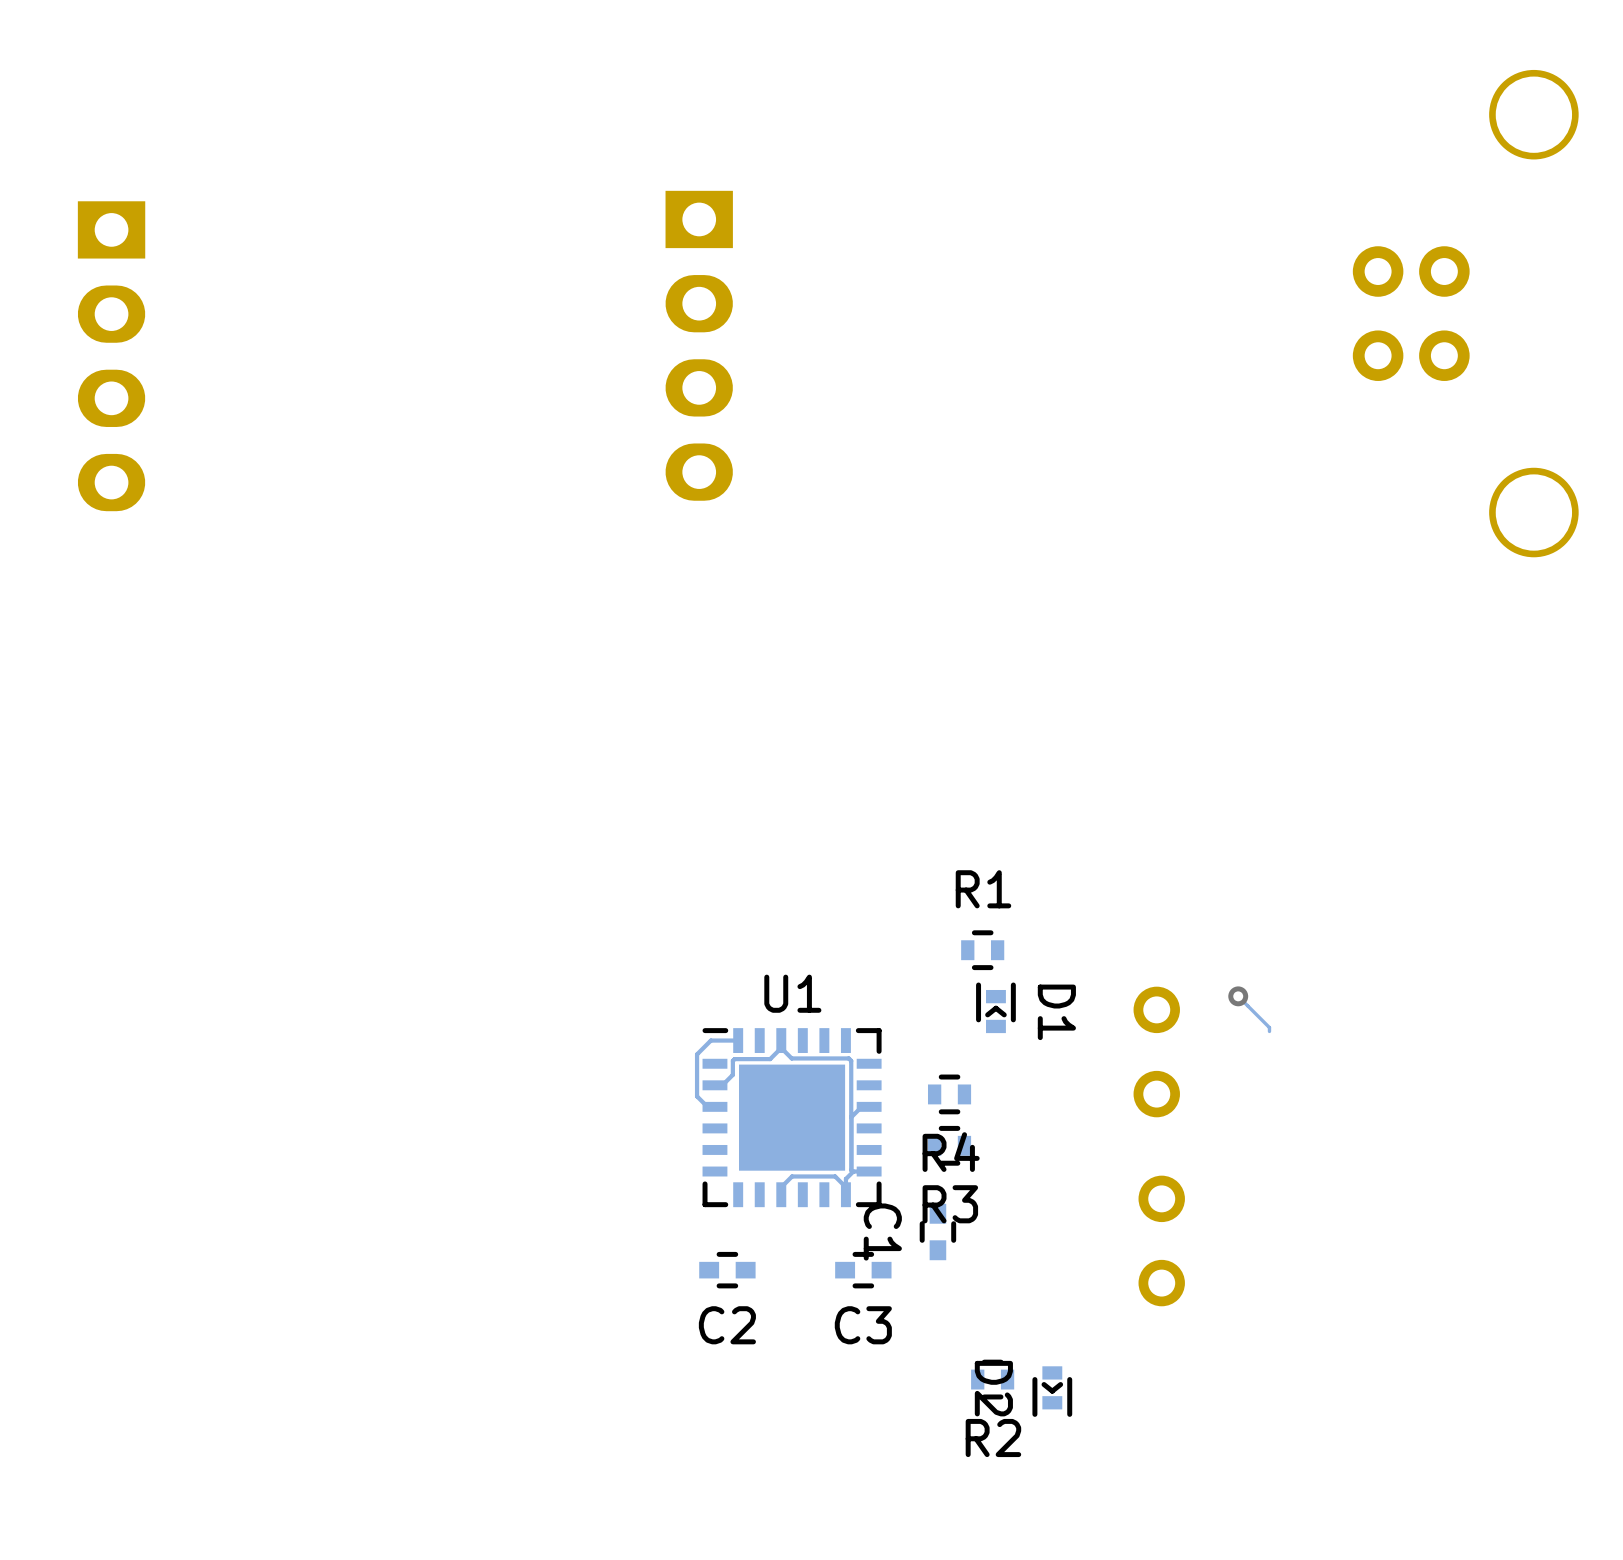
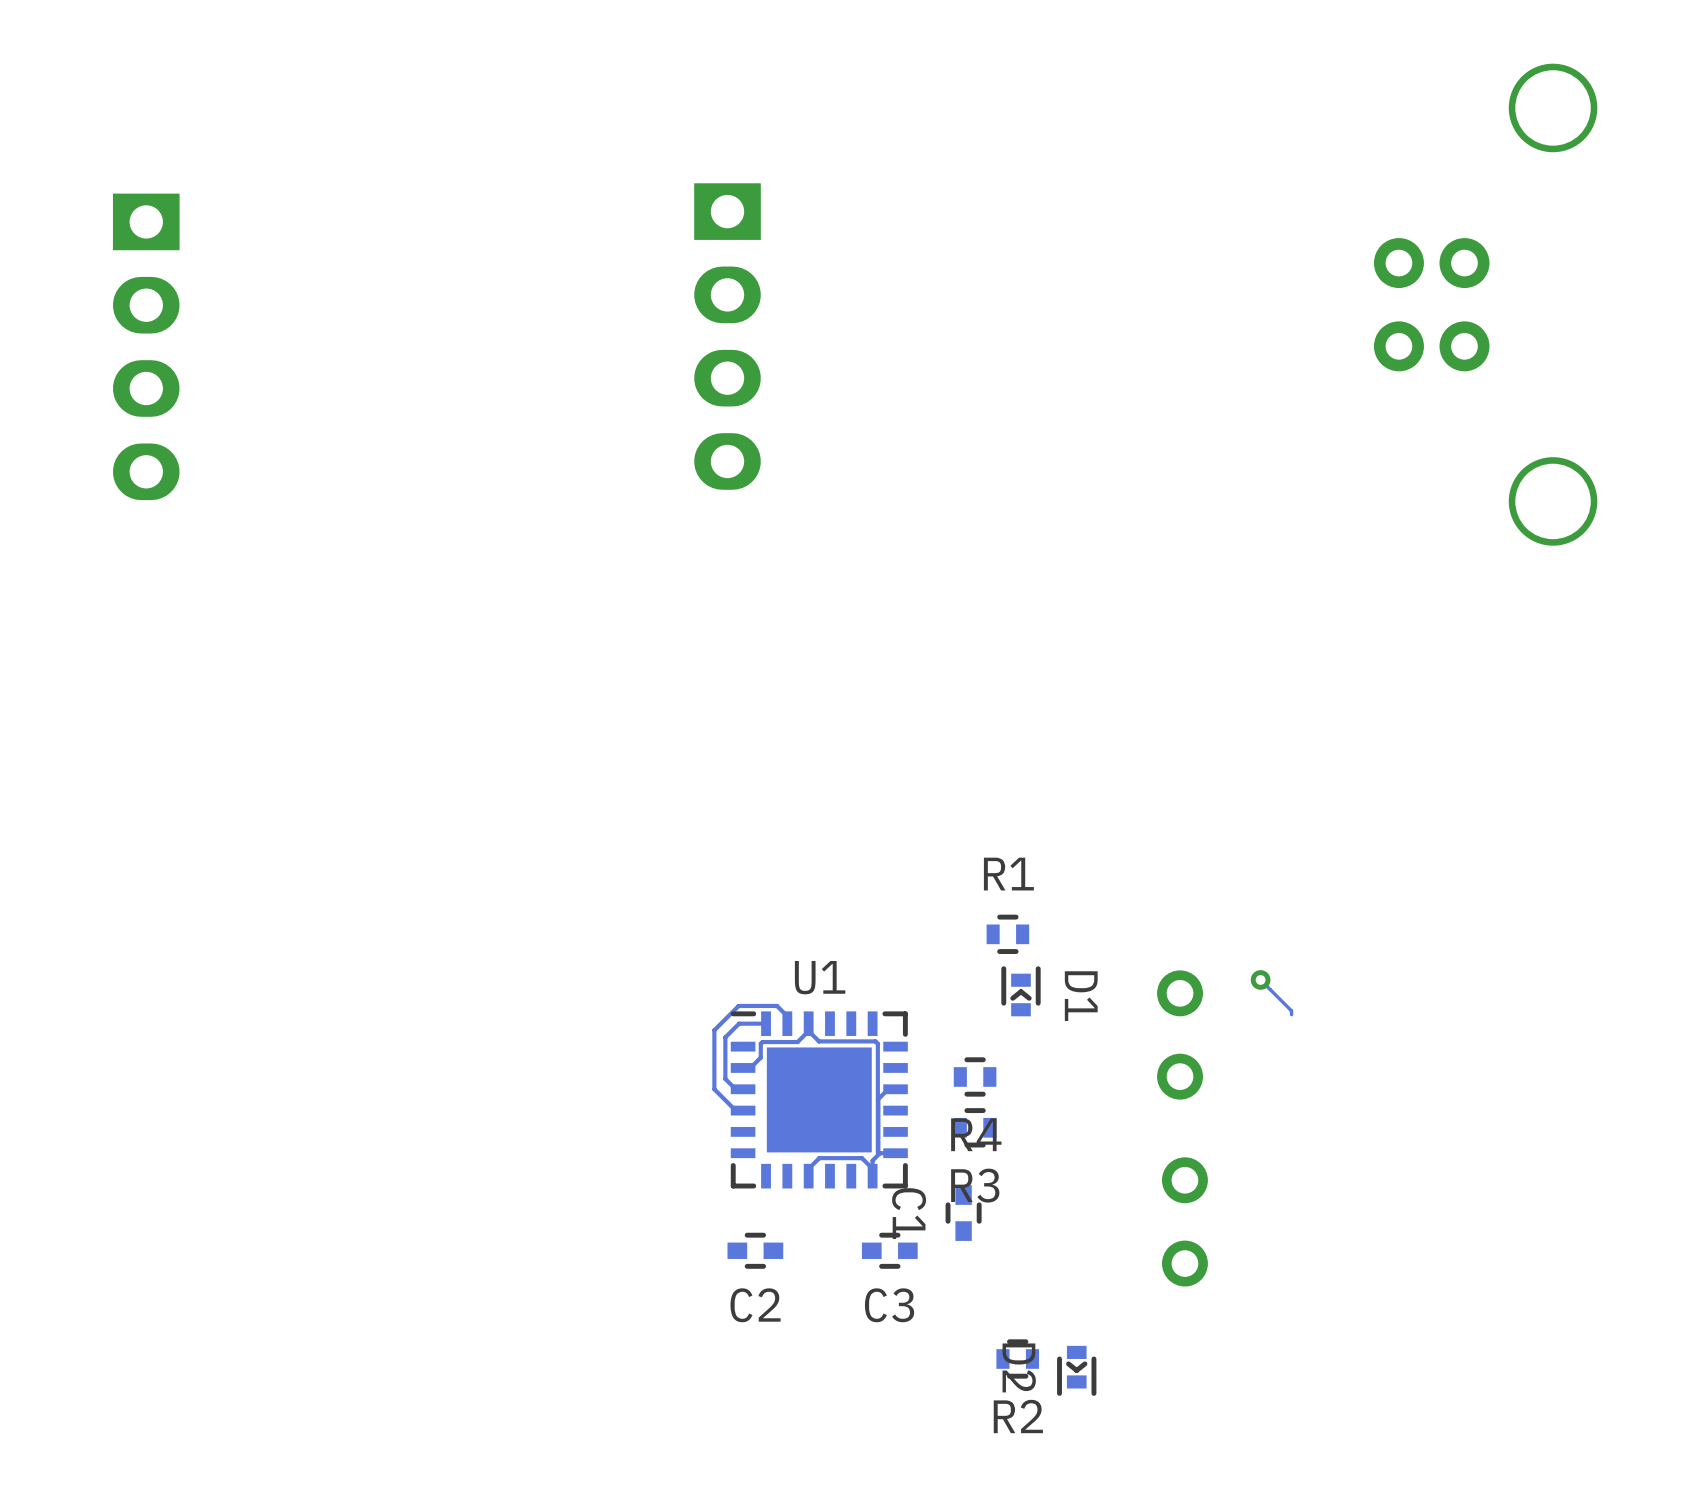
track: none -> (787, 1023) (787, 1016) (777, 1005) (738, 1005) (714, 1030) (714, 1089) (735, 1110) (743, 1110)

